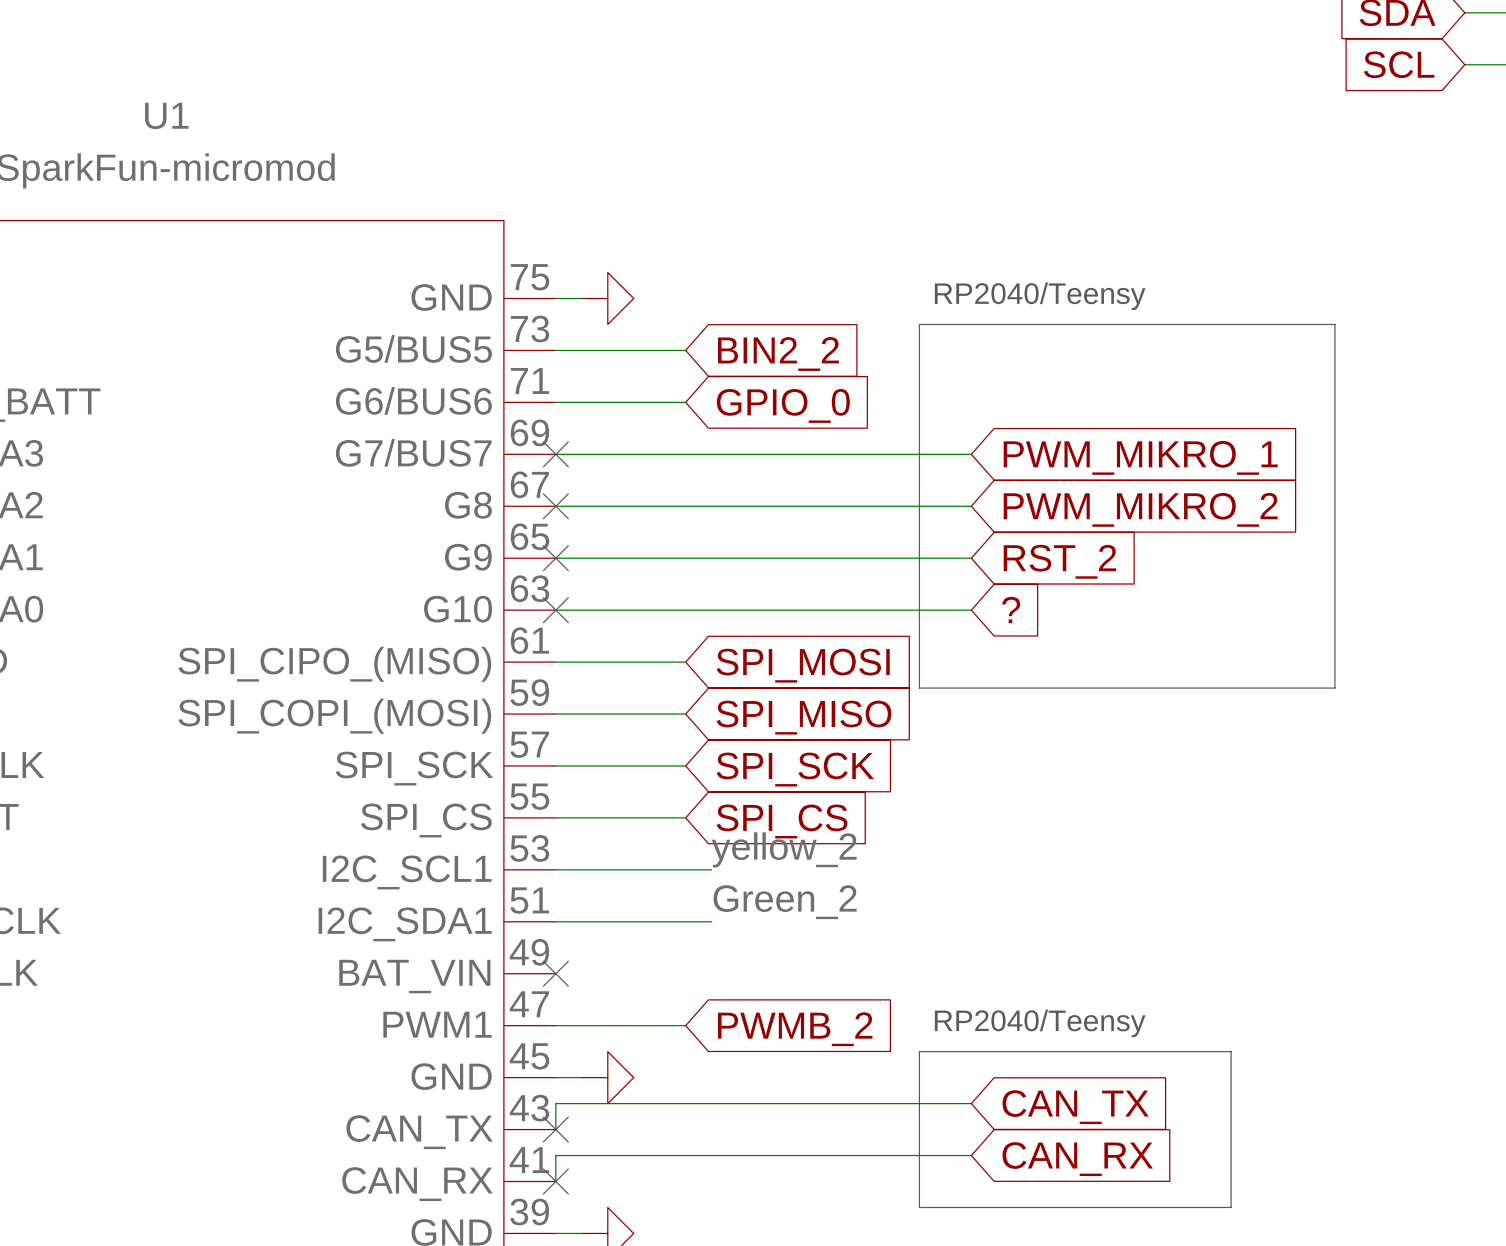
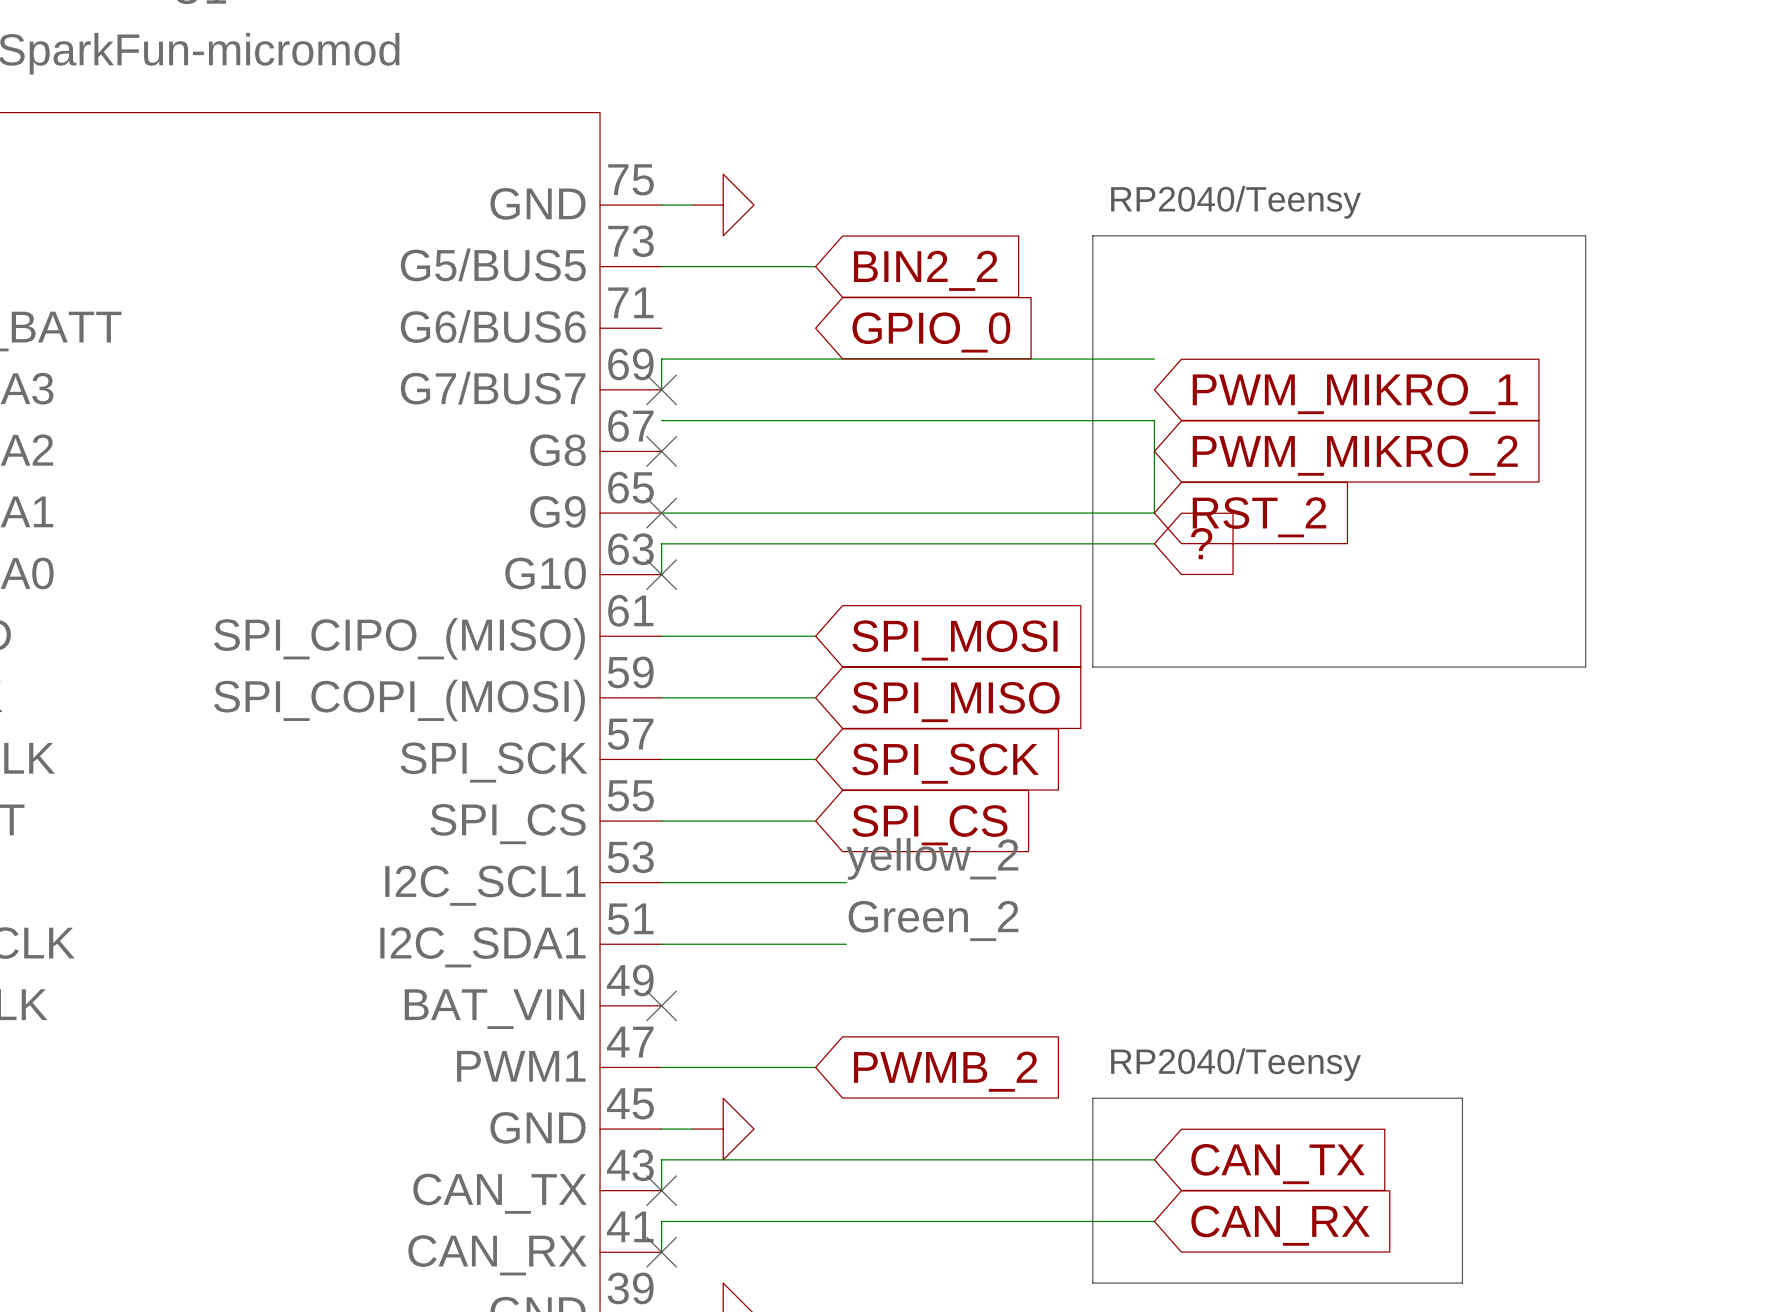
wire: (555, 402) (685, 402) -> none
wire: (555, 454) (971, 454) -> (661, 389) (661, 359) (1154, 359)
wire: none -> (661, 420) (1154, 420) (1154, 513)
wire: (555, 506) (971, 506) -> none
global label position: ? (1011, 609) -> ? (1201, 543)
wire: (555, 610) (971, 610) -> (661, 574) (661, 543) (1154, 543)

